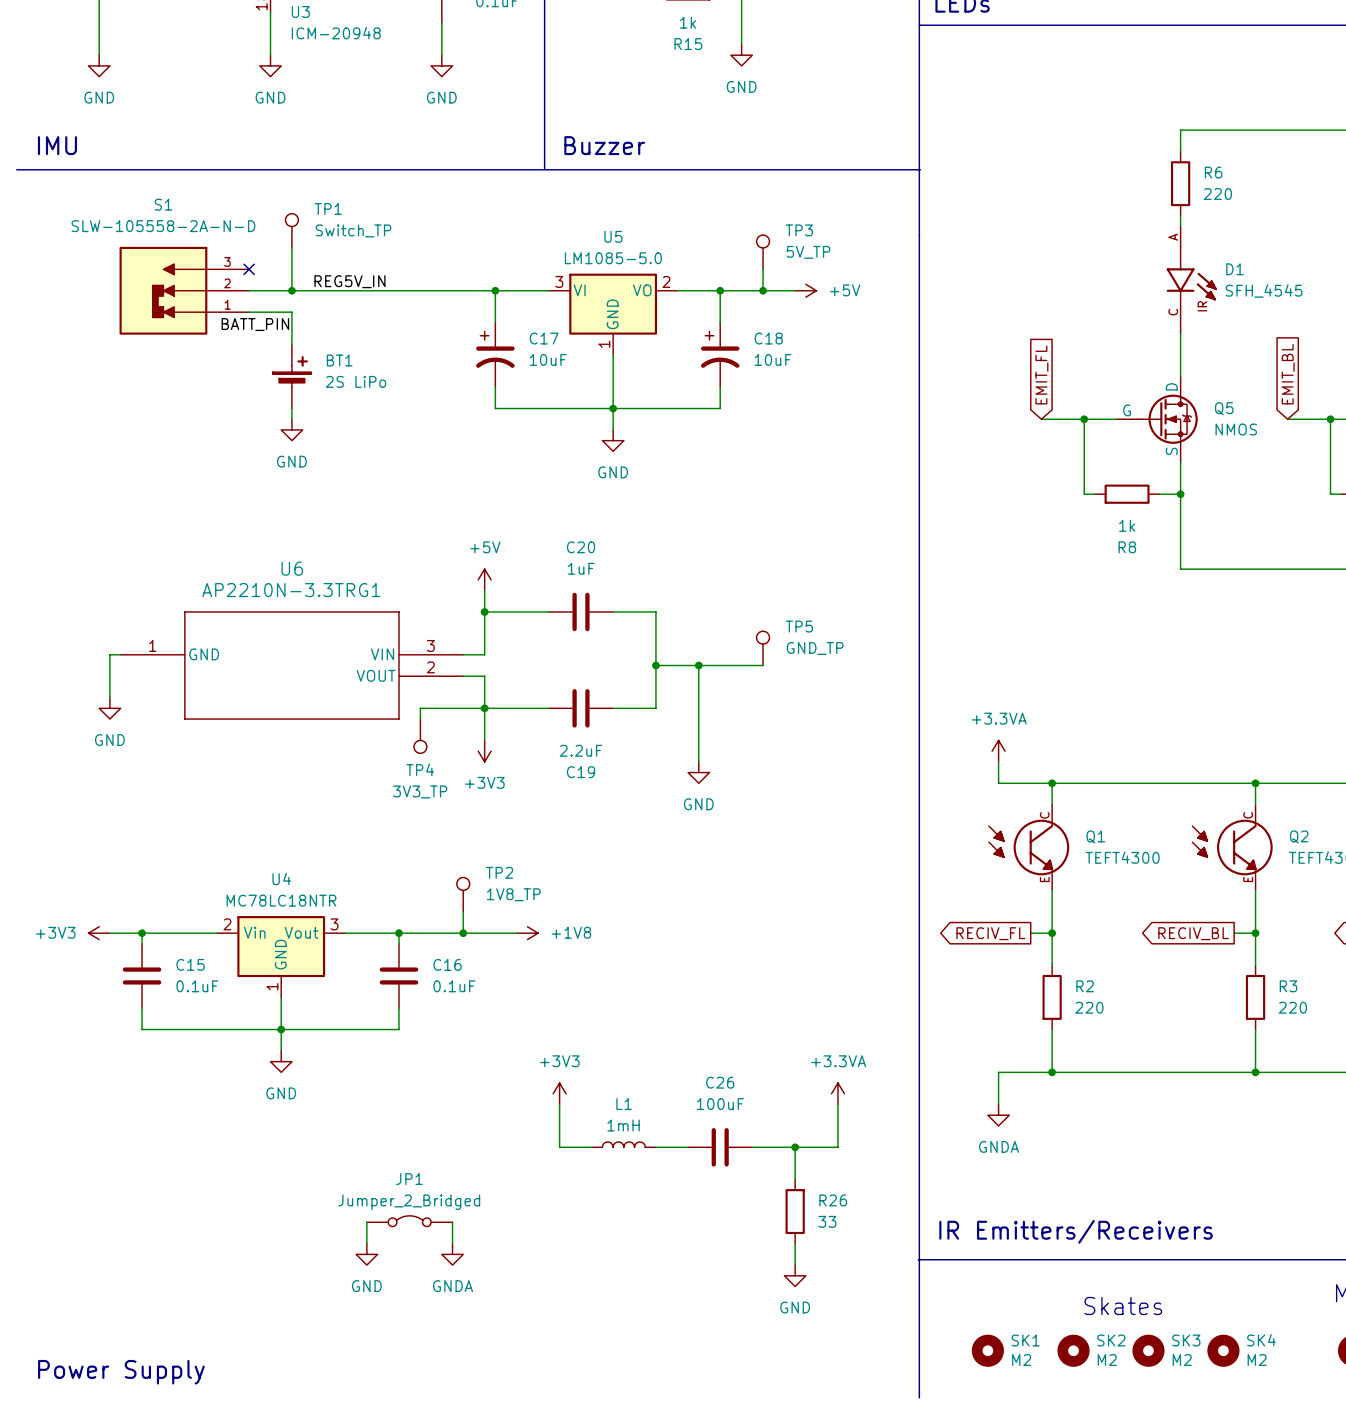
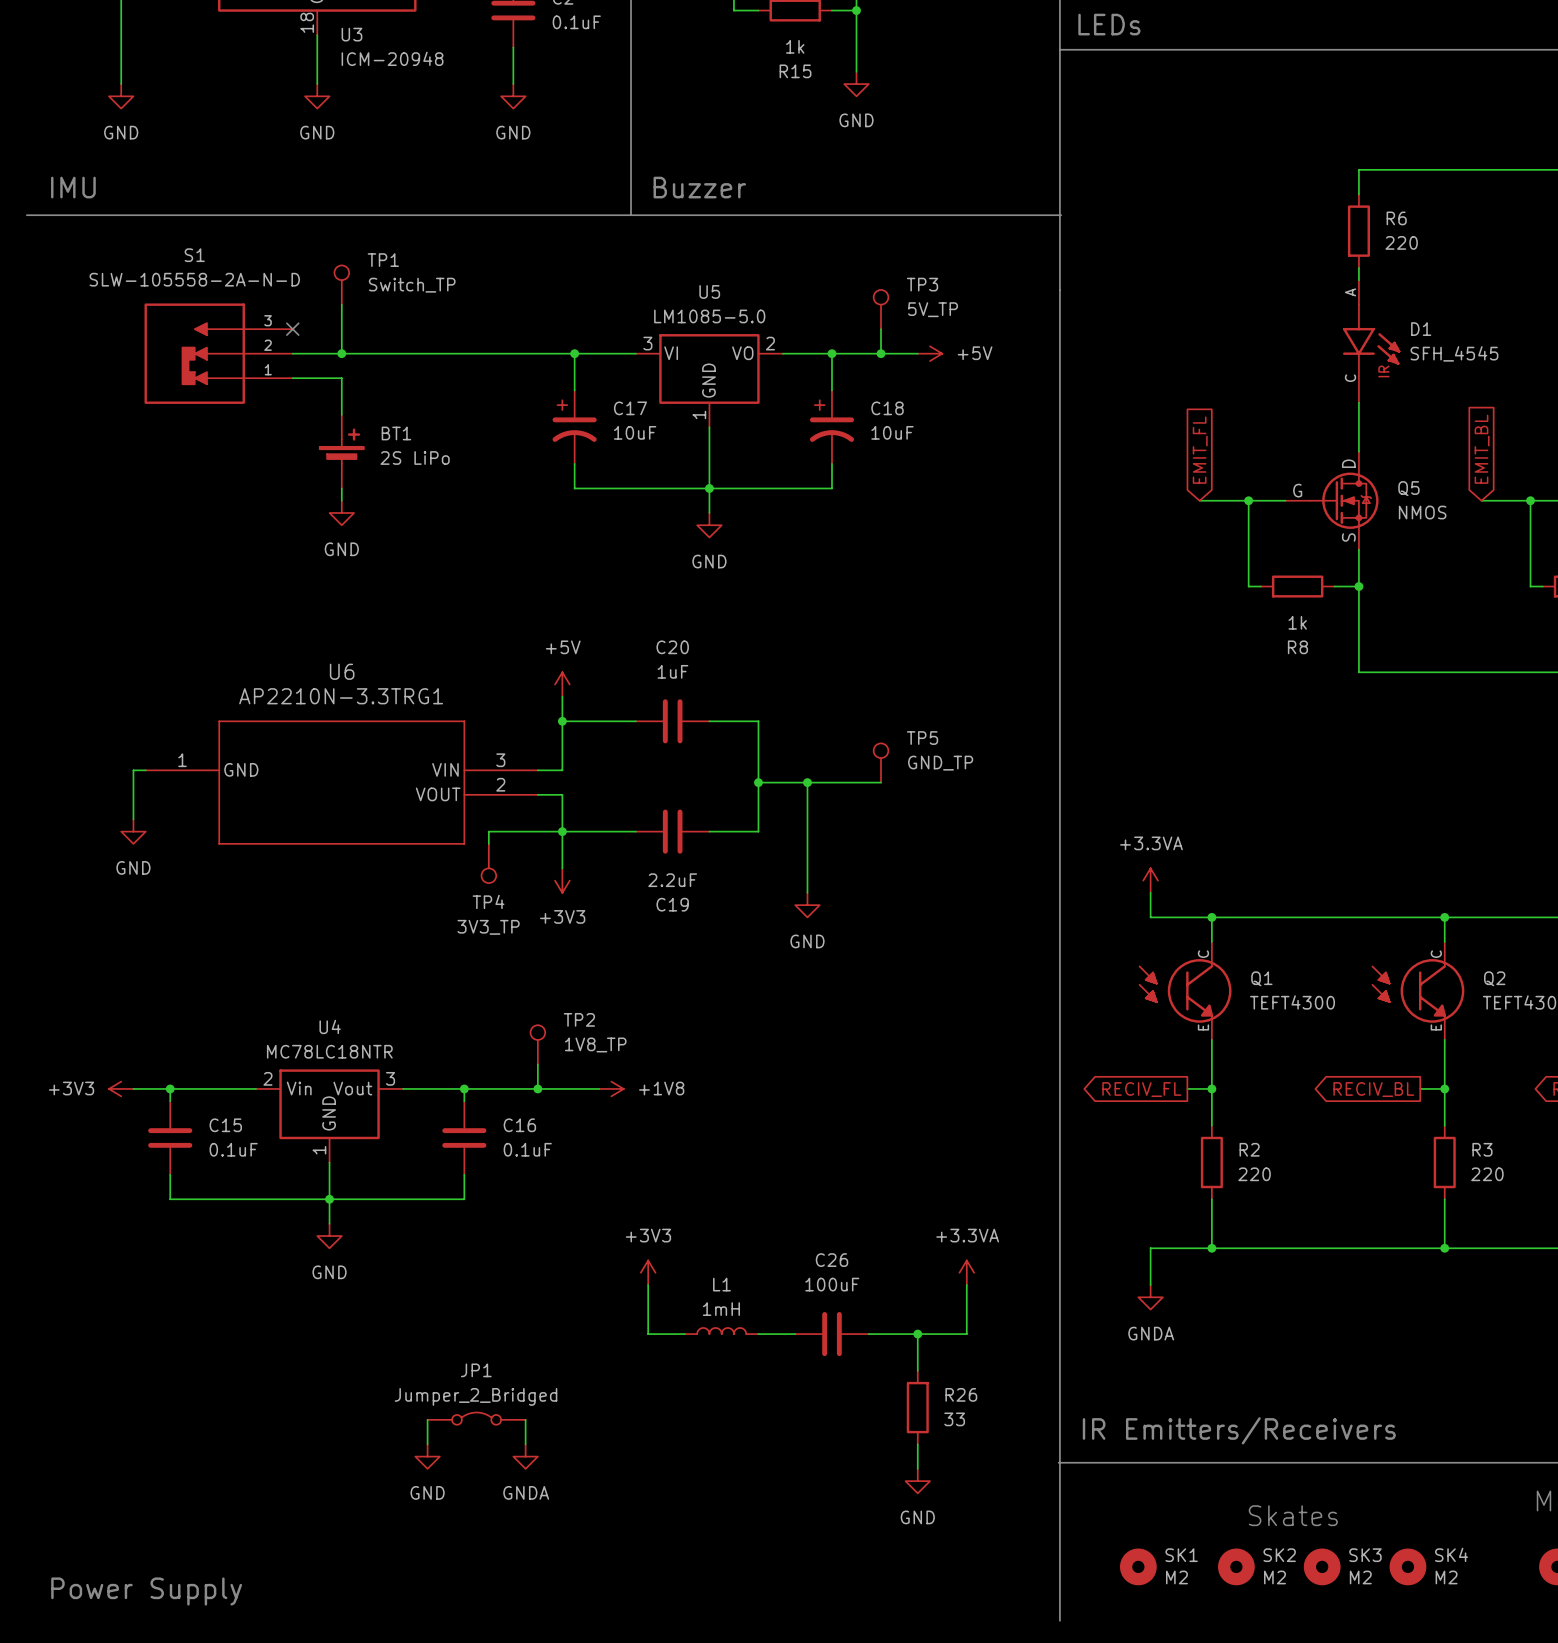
label: REG5V_IN (349, 281) -> none
label: BATT_PIN (255, 324) -> none

